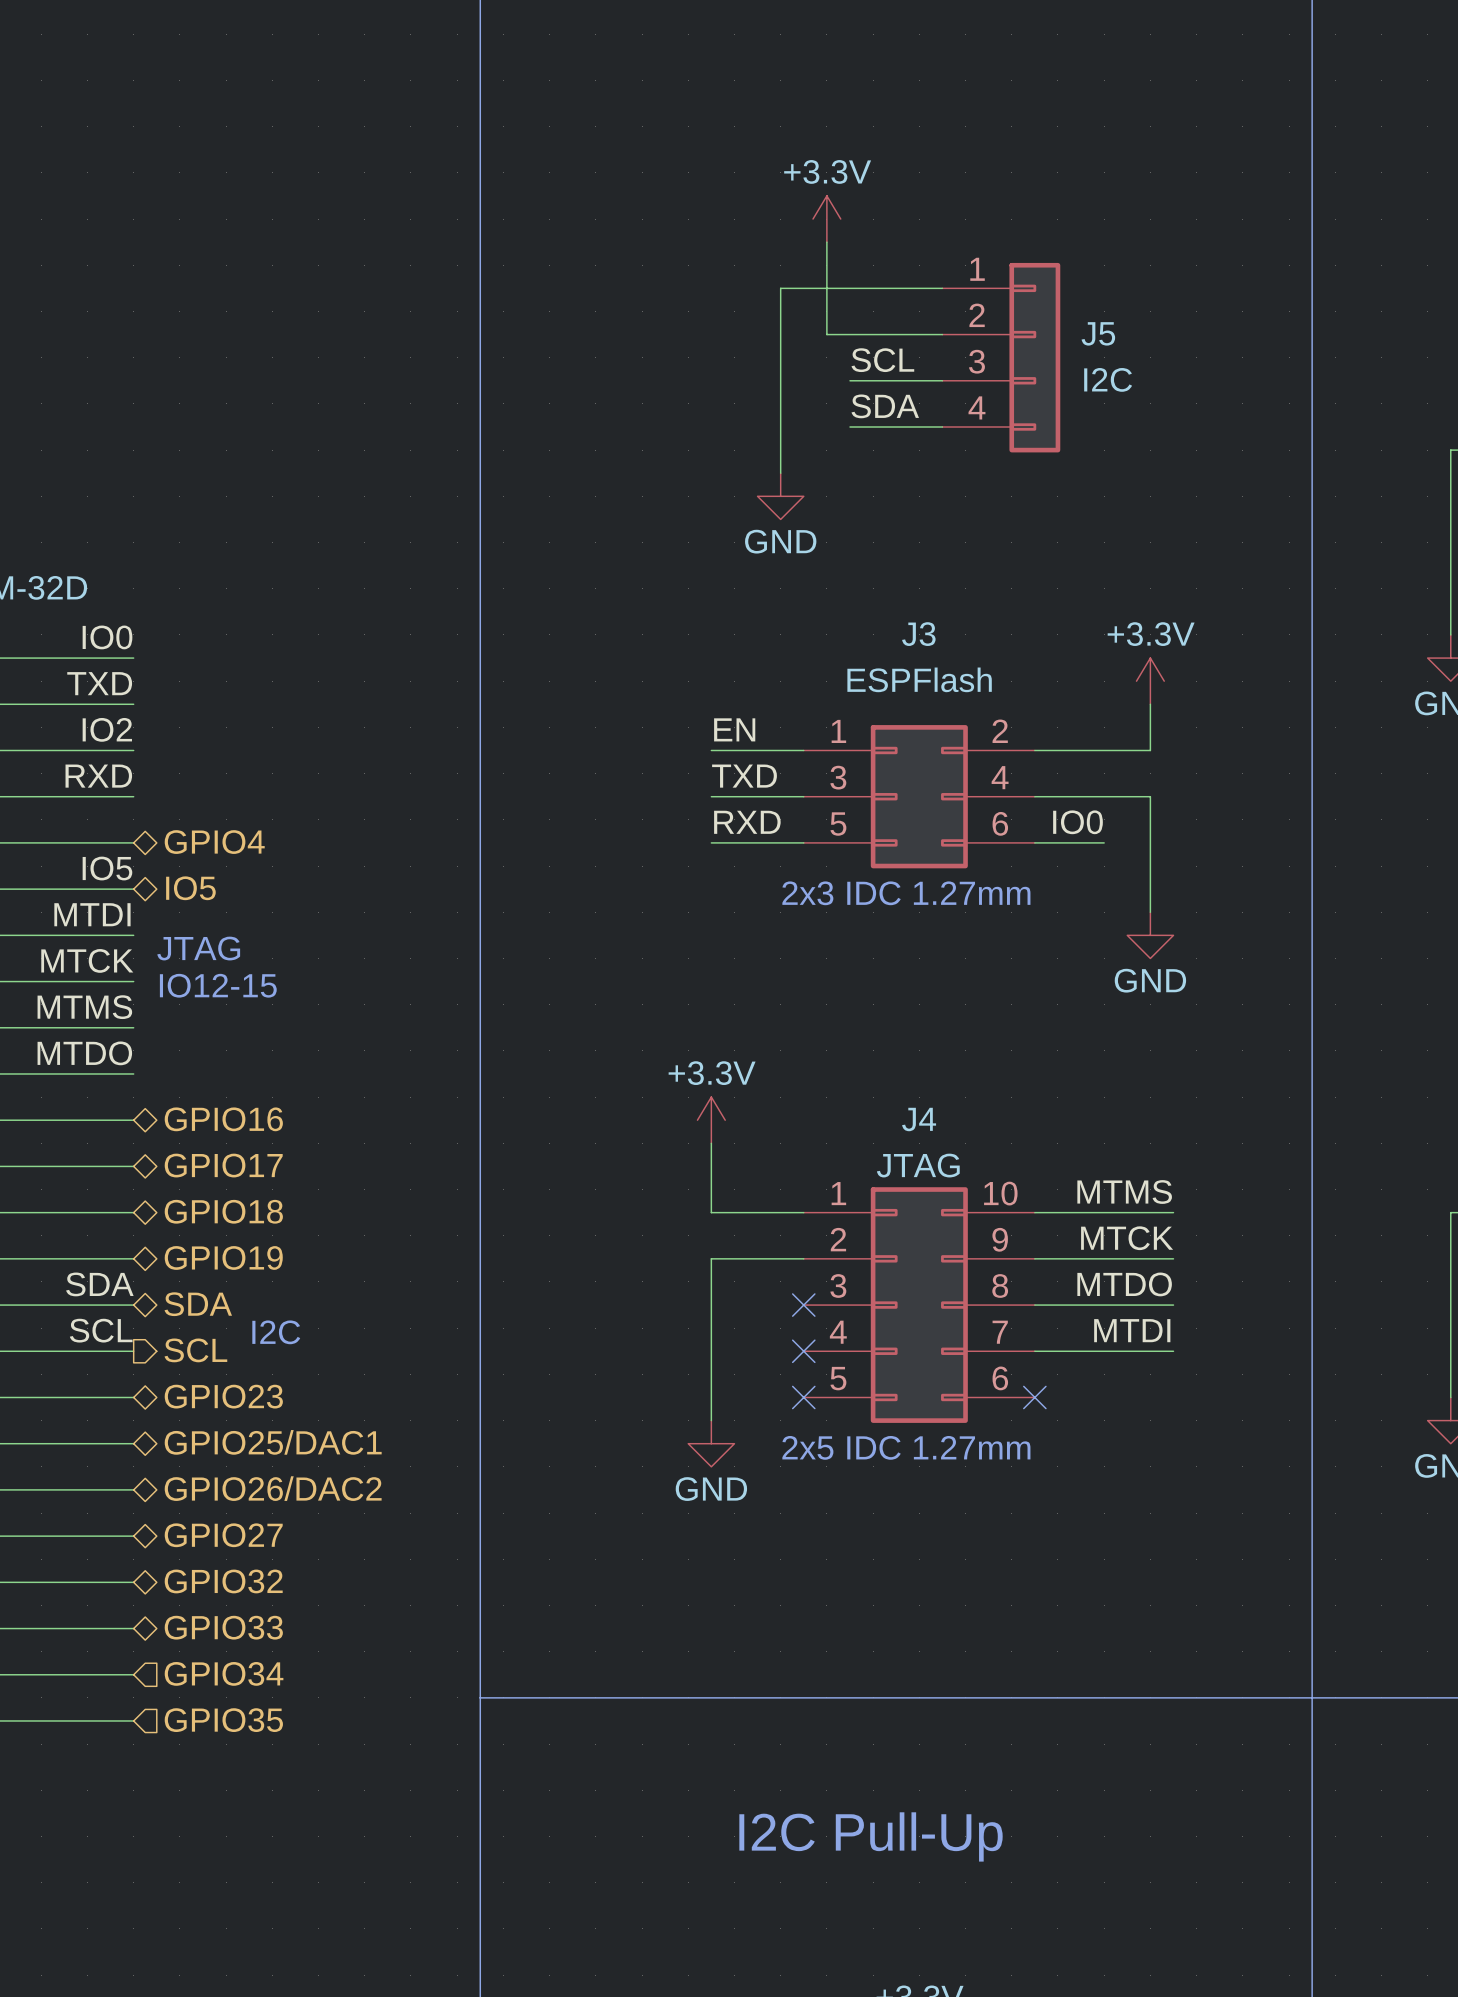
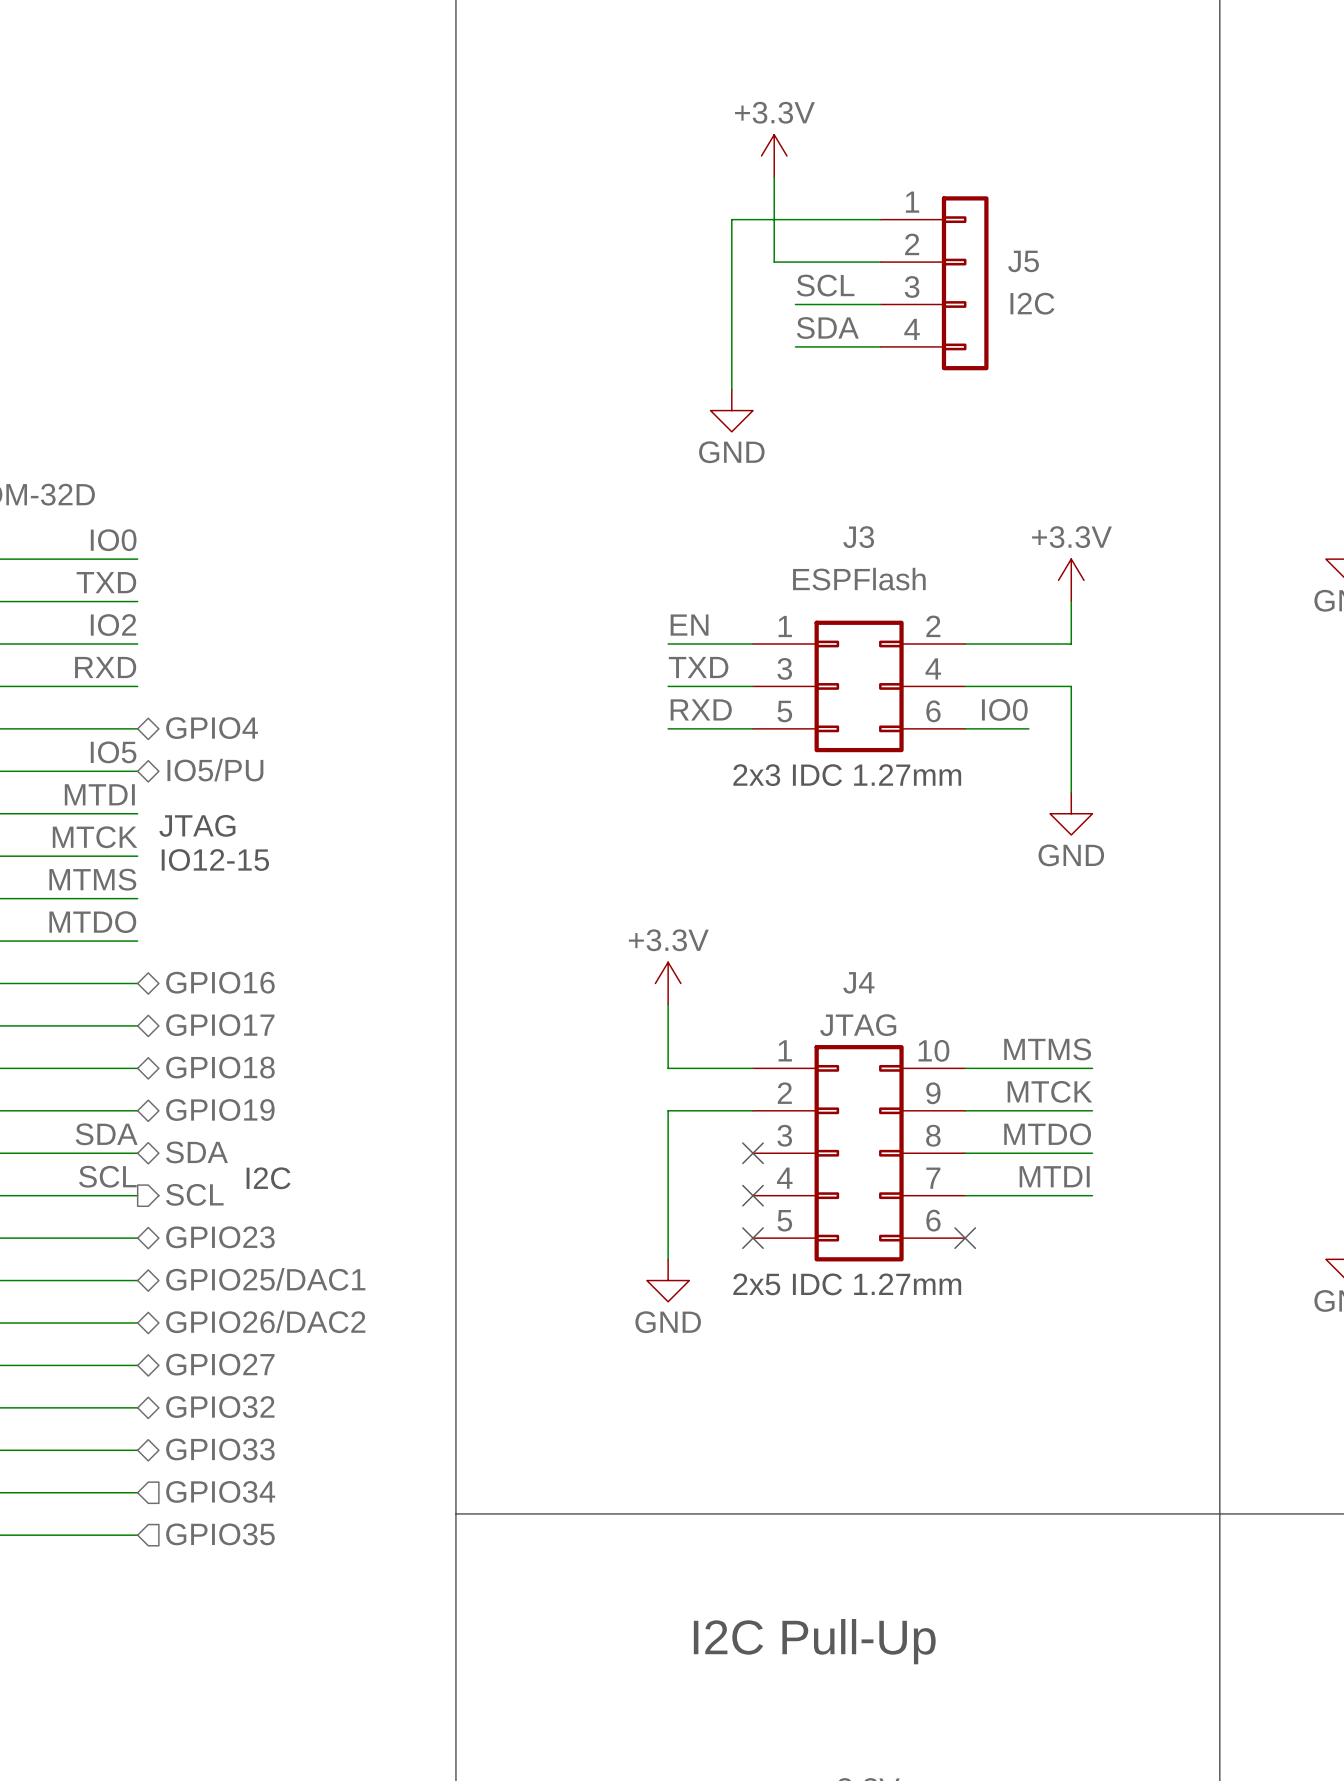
hierarchical label: IO5 (190, 888) -> IO5/PU (215, 770)

